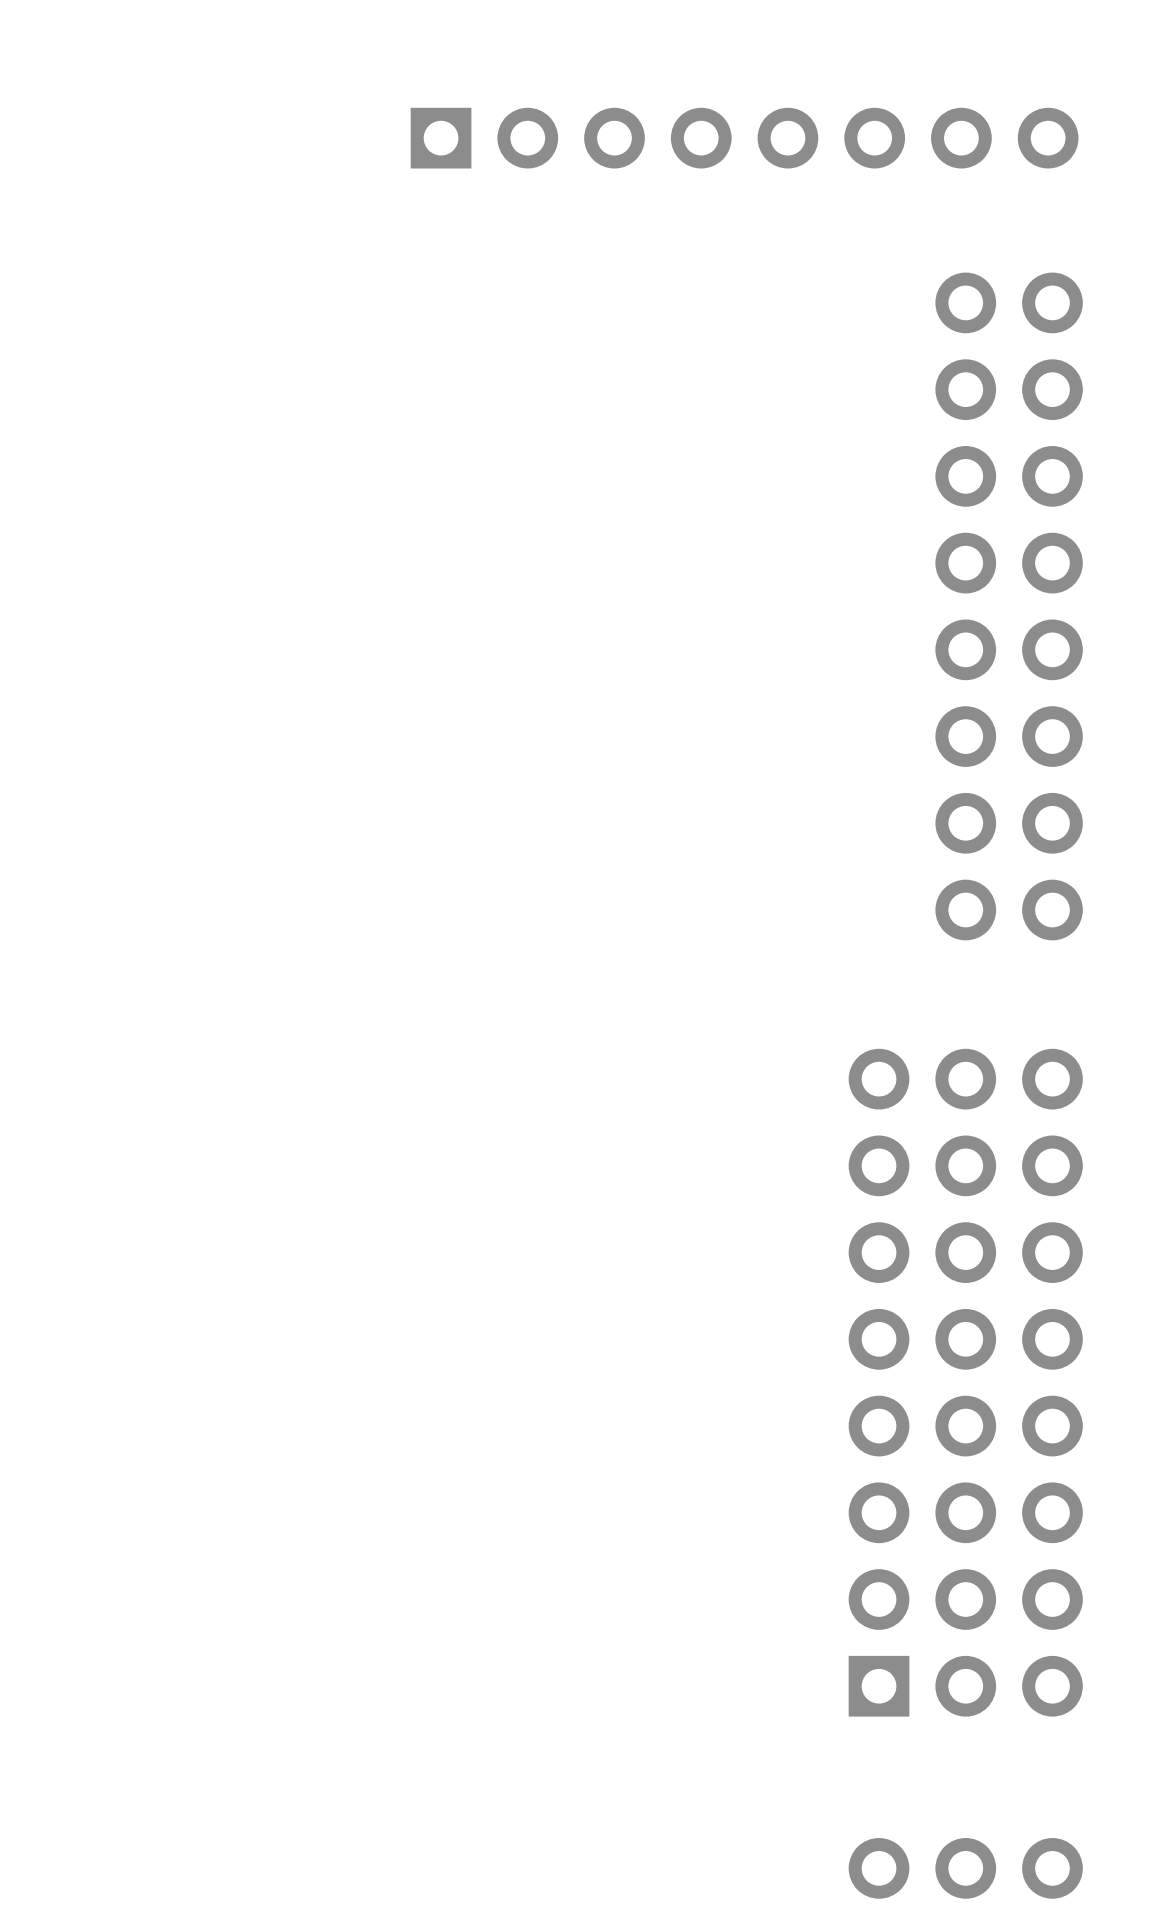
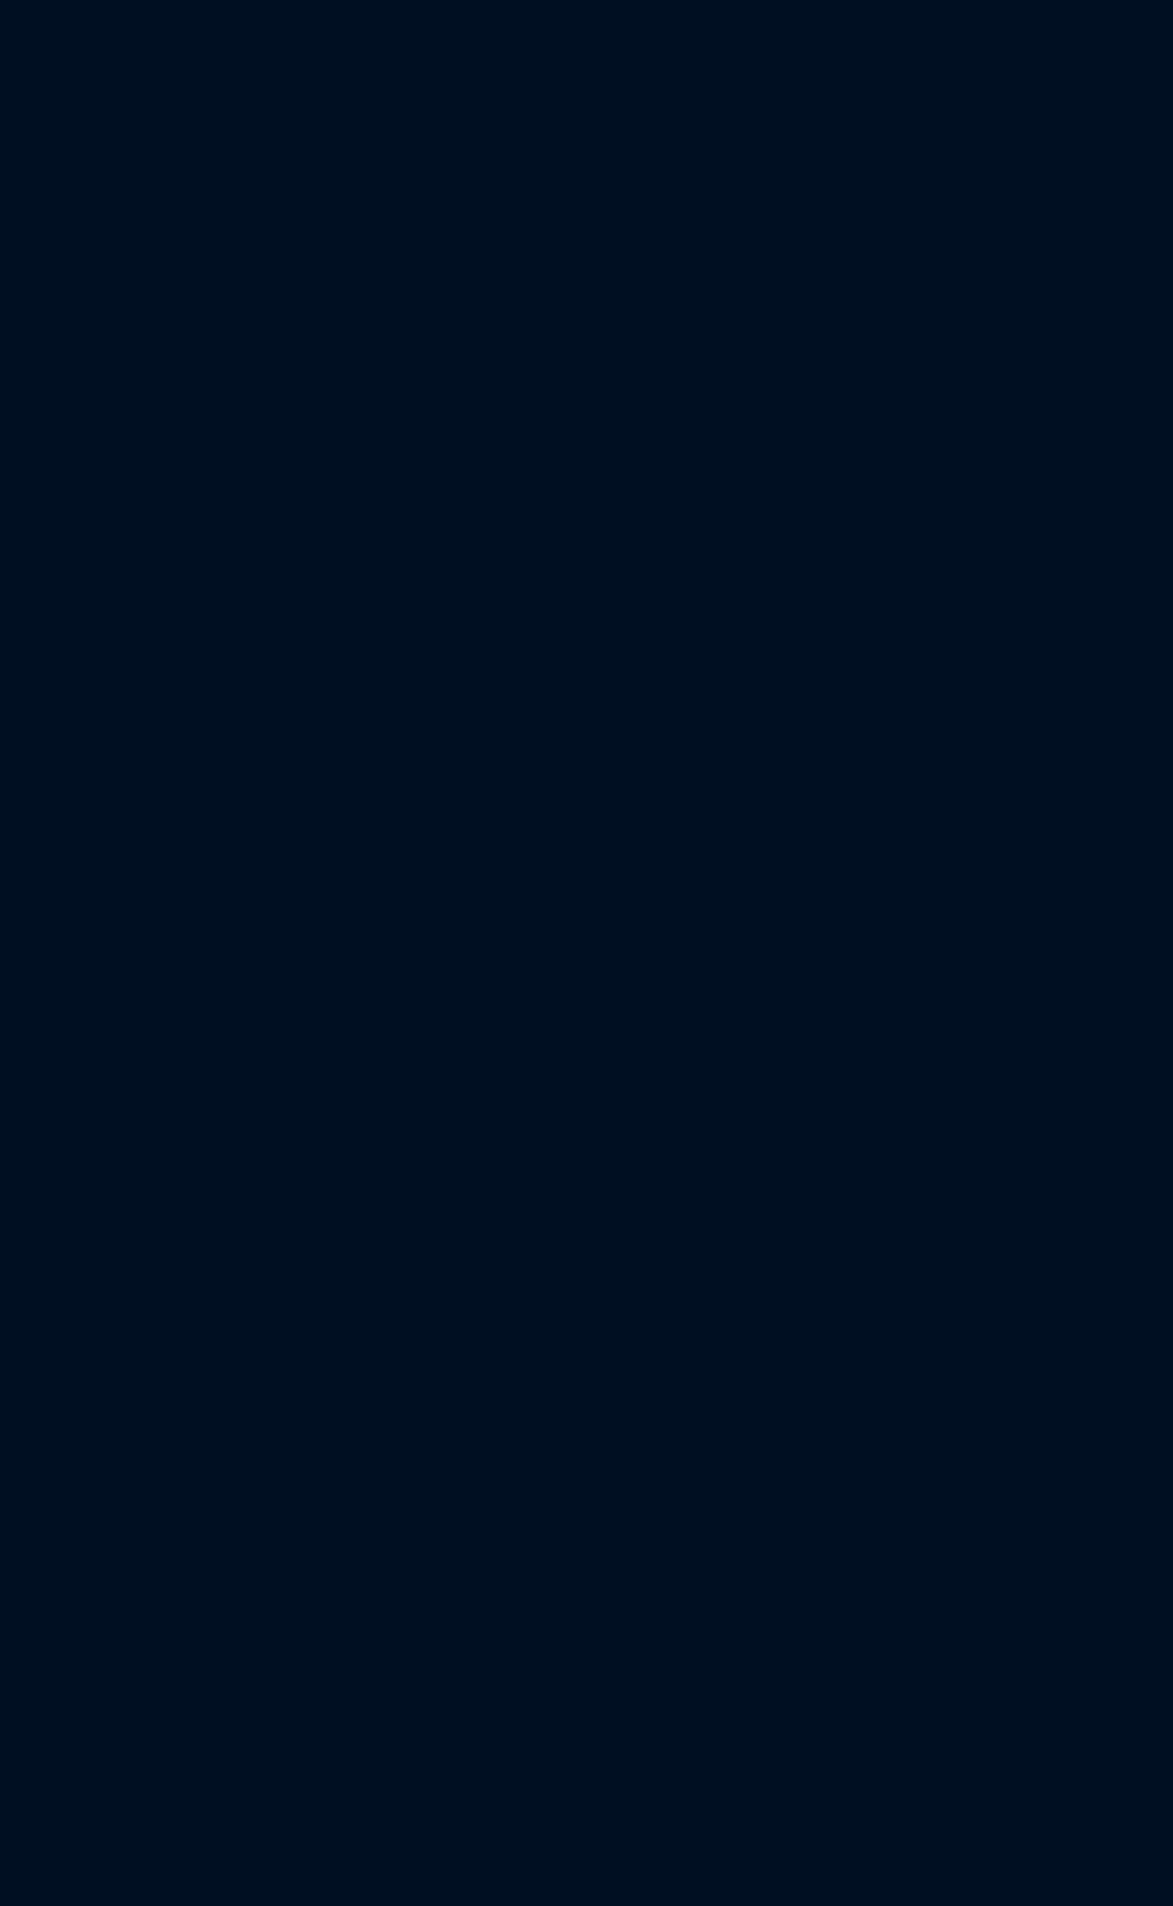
part: (744, 138) -> none
part: (1009, 302) -> none
part: (1009, 389) -> none
part: (1009, 476) -> none
part: (1009, 563) -> none
part: (1009, 649) -> none
part: (1009, 736) -> none
part: (1009, 823) -> none
part: (1009, 910) -> none
part: (965, 1382) -> none
part: (965, 1868) -> none

